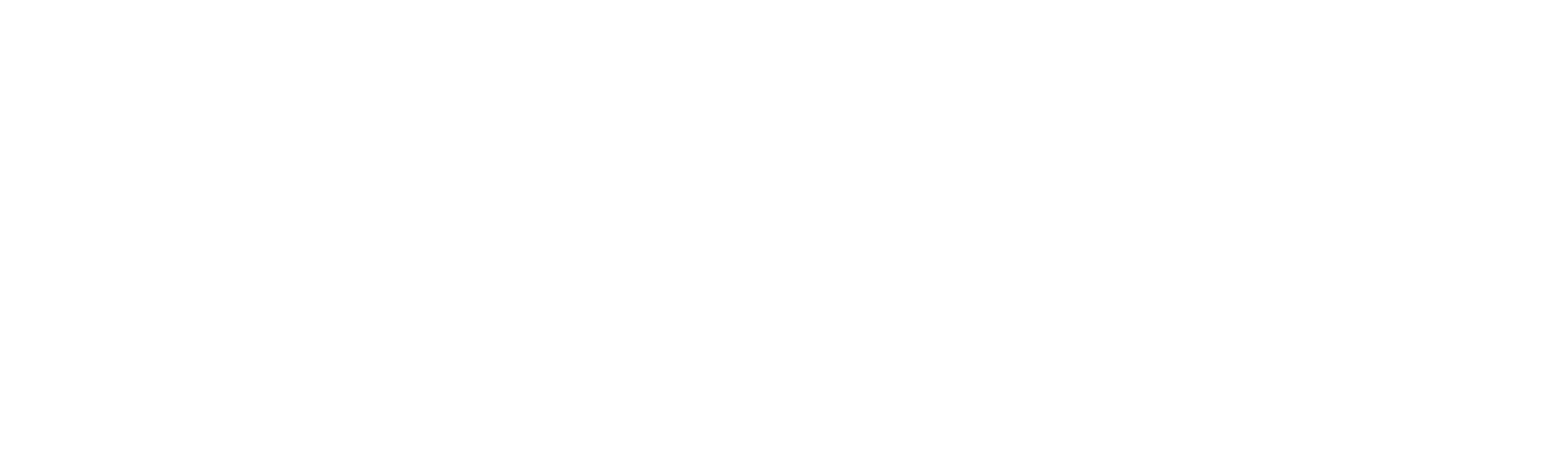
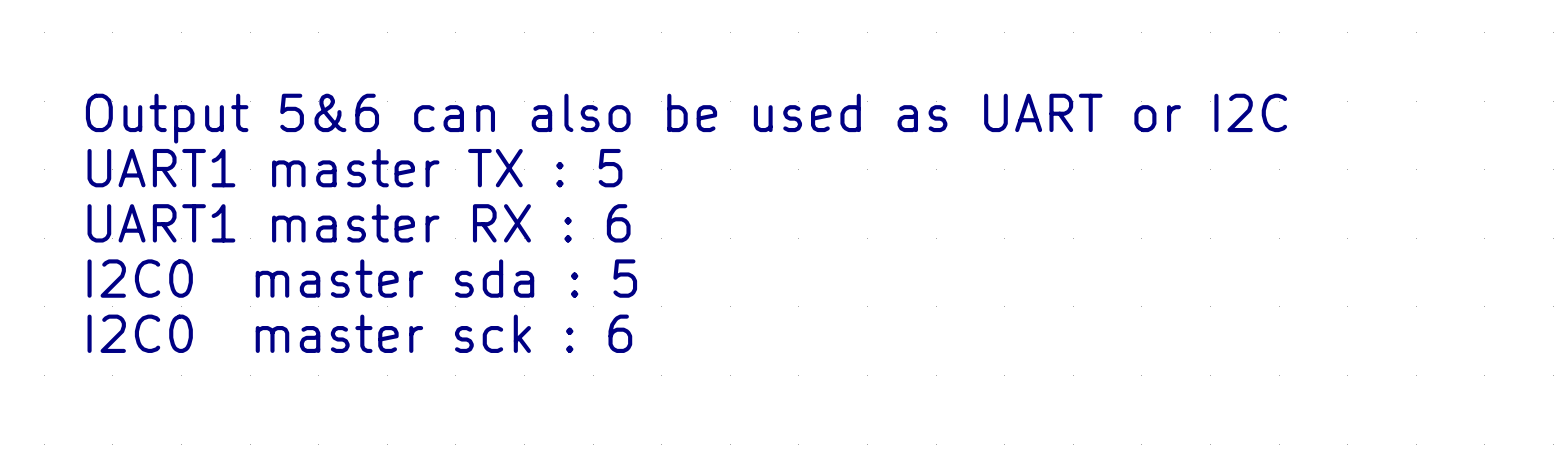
text: none -> Output 5&6 can also be used as UART or I2C (686, 118)
text: none -> UART1 master TX : 5 (354, 168)
text: none -> UART1 master RX : 6 (359, 223)
text: none -> I2C0 master sda : 5 (362, 278)
text: none -> I2C0 master sck : 6 (359, 333)

